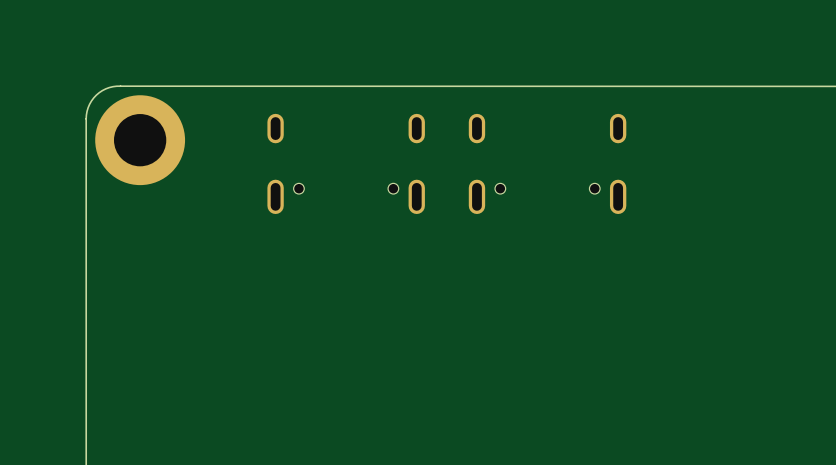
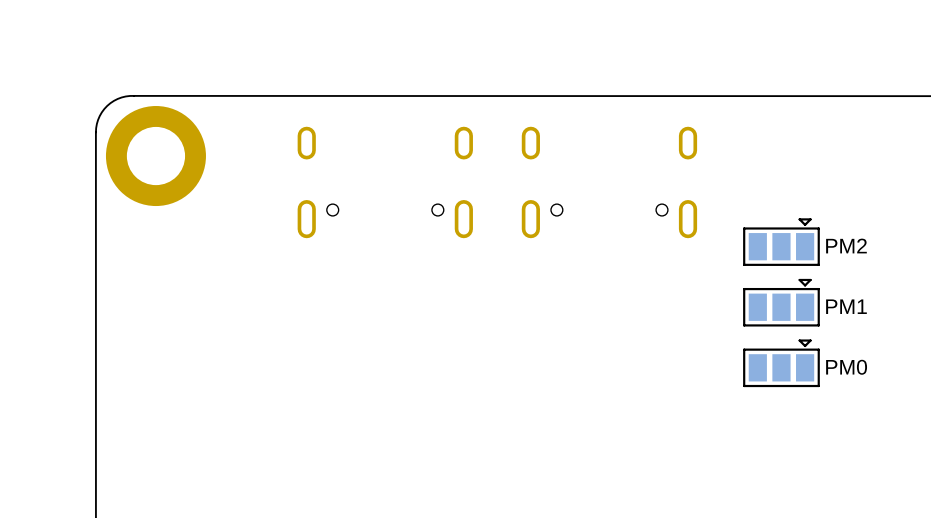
PM2: none -> (781, 242)
PM1: none -> (781, 302)
PM0: none -> (781, 363)

